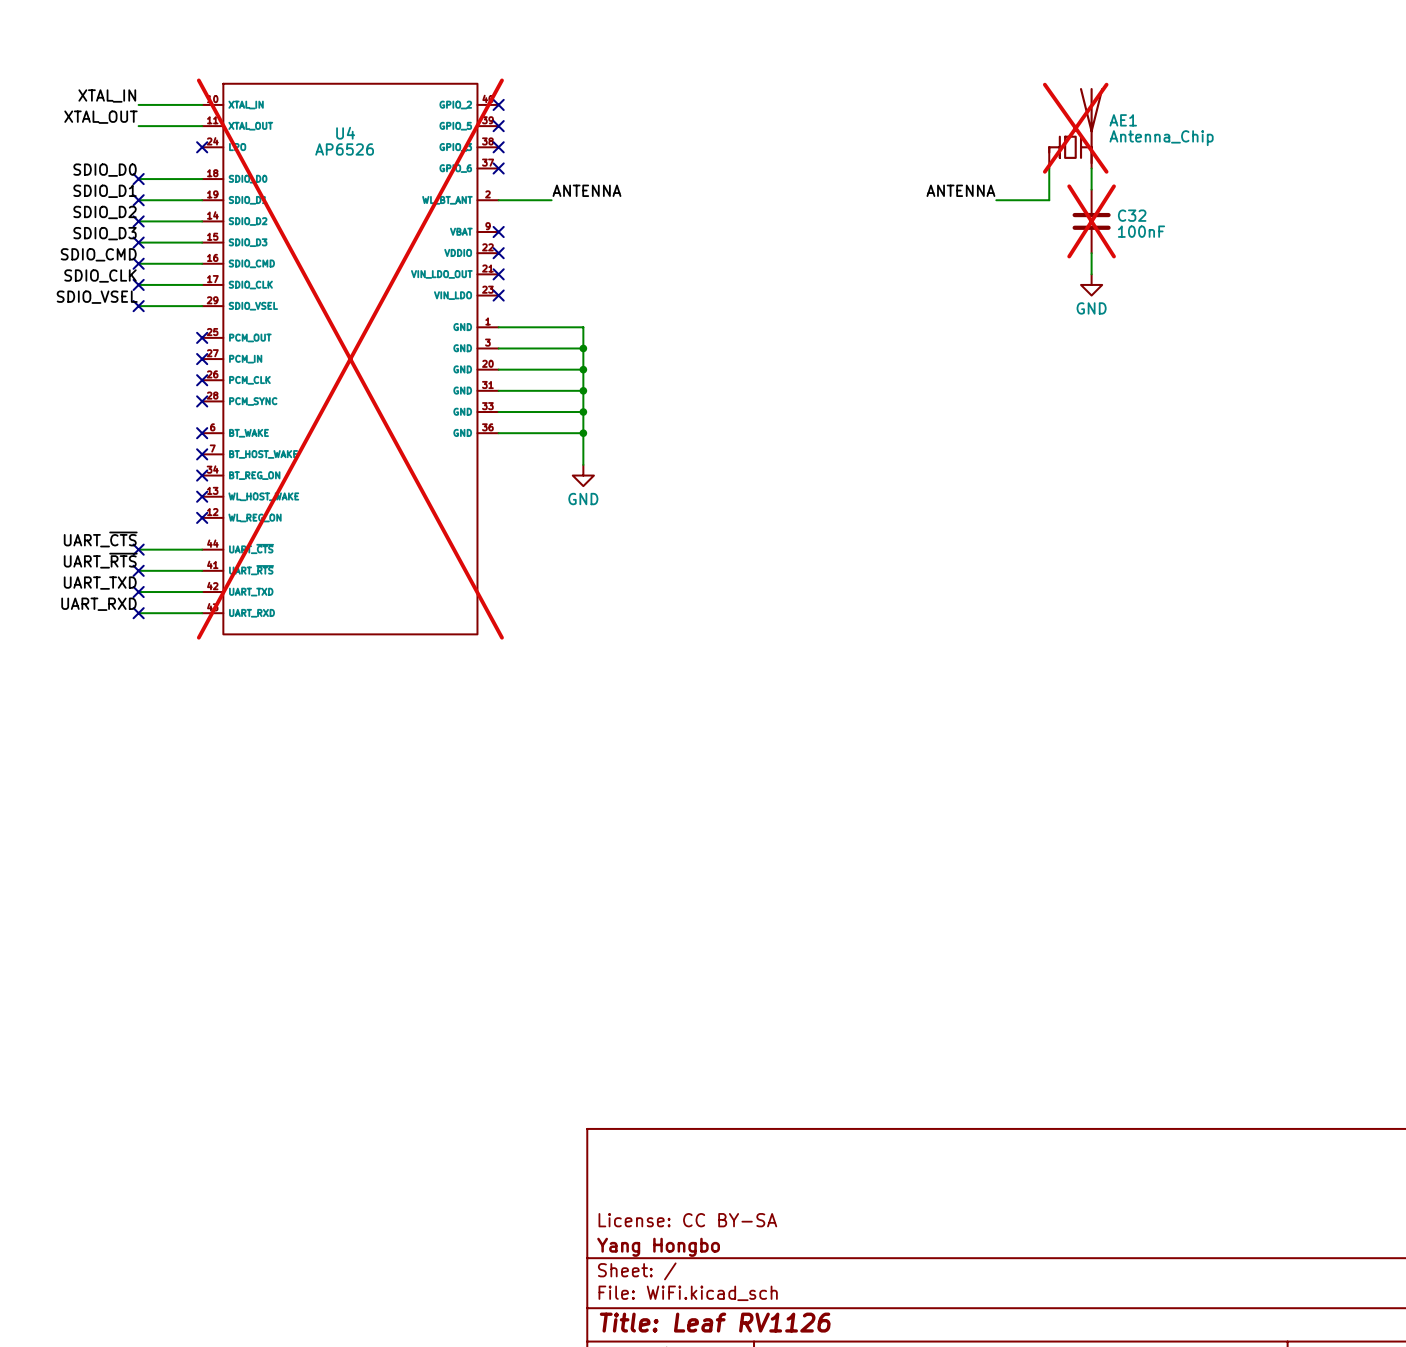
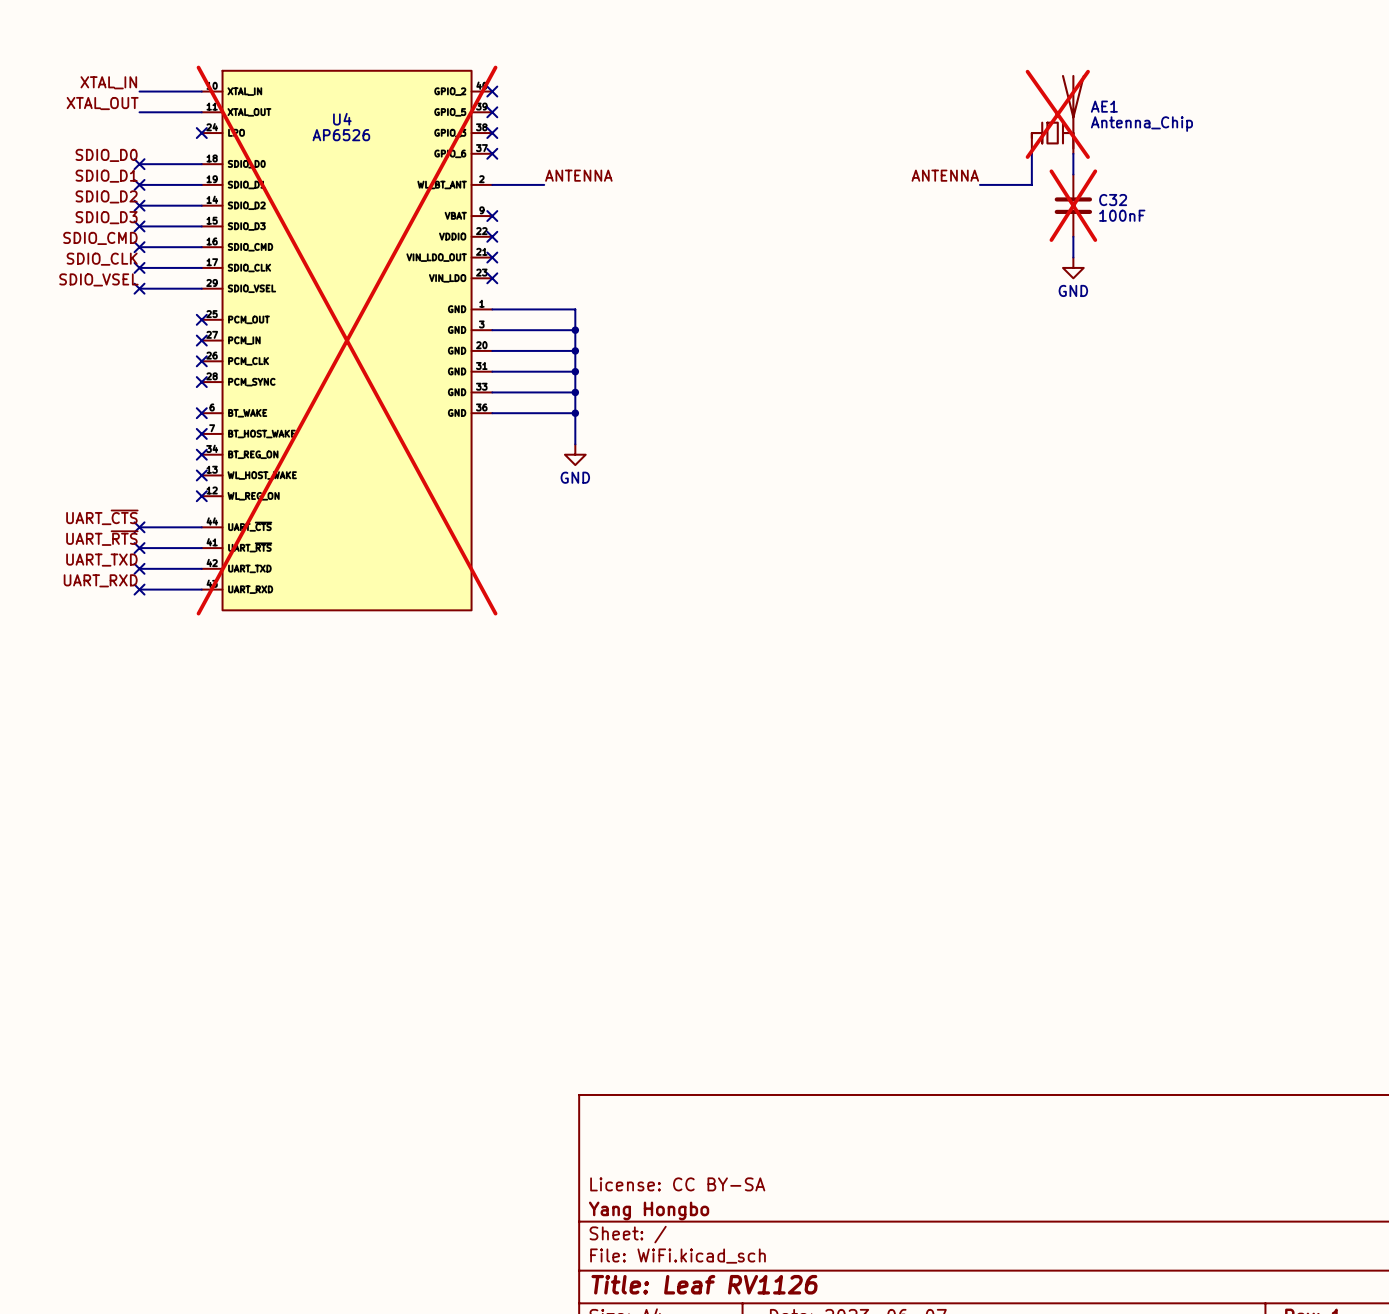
U4 symbol: [202, 83, 499, 635] -> [201, 70, 493, 611]

